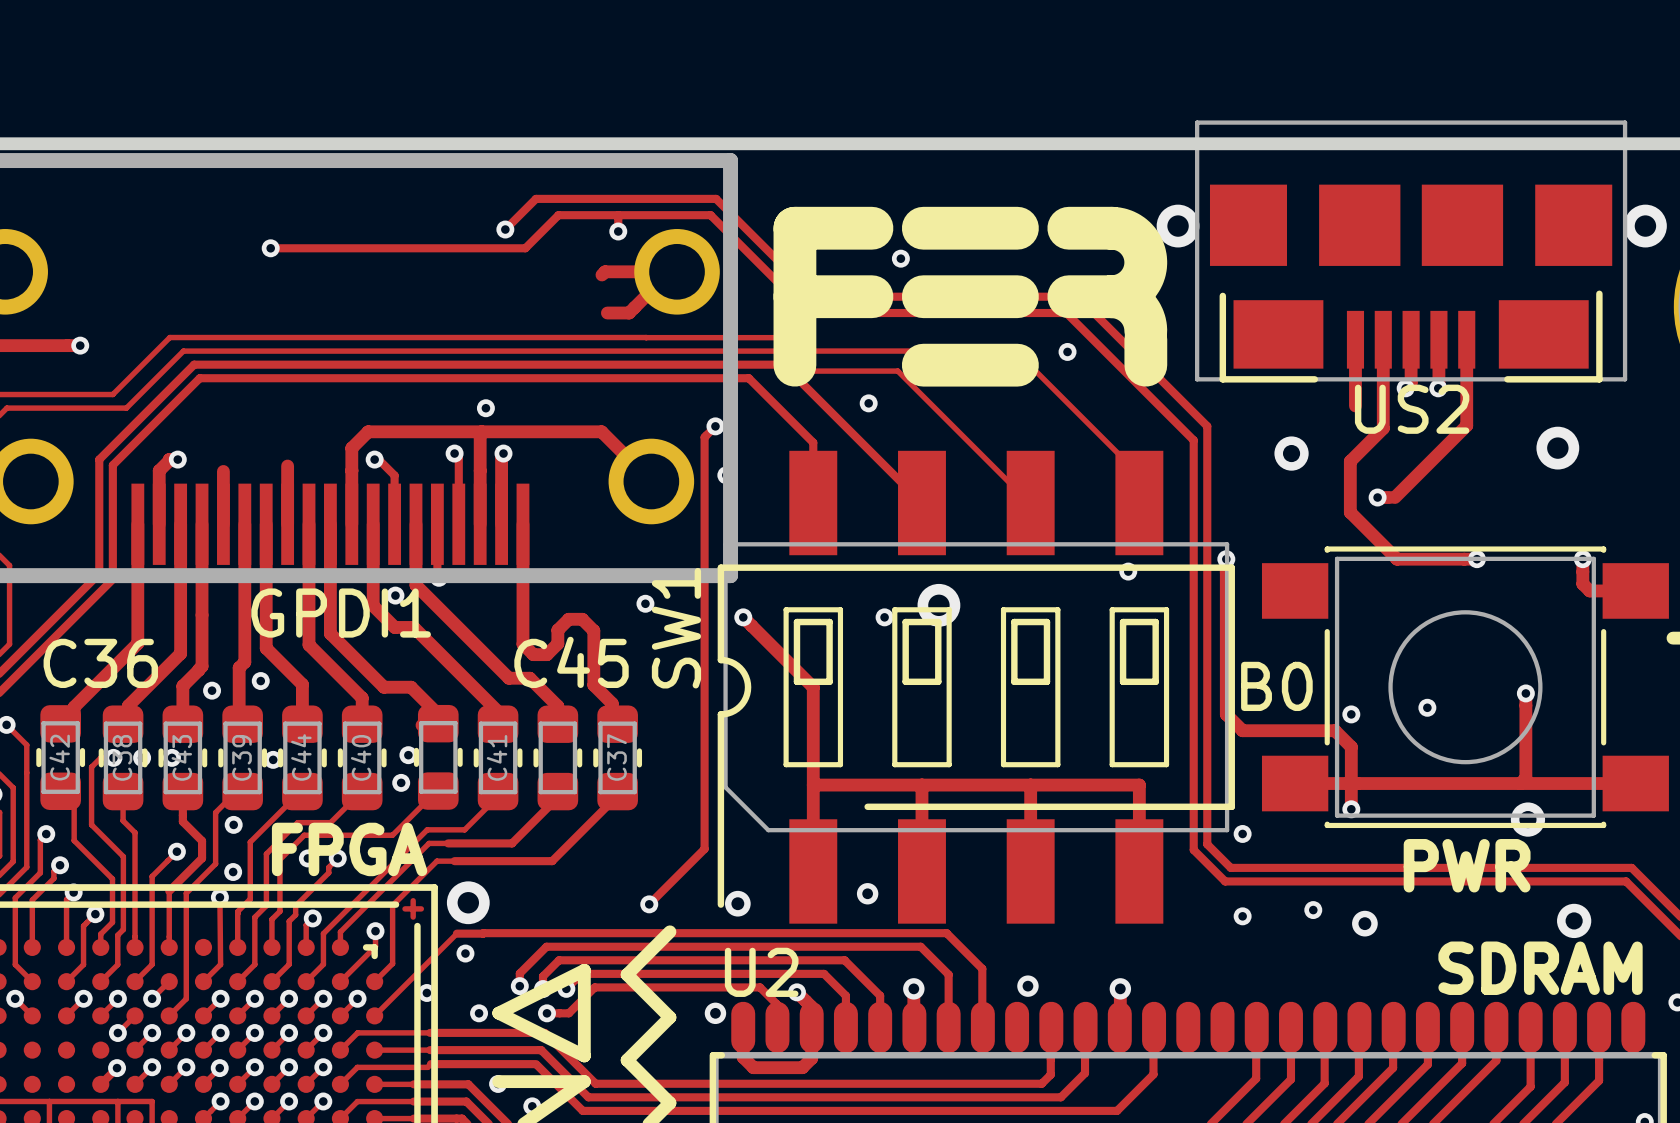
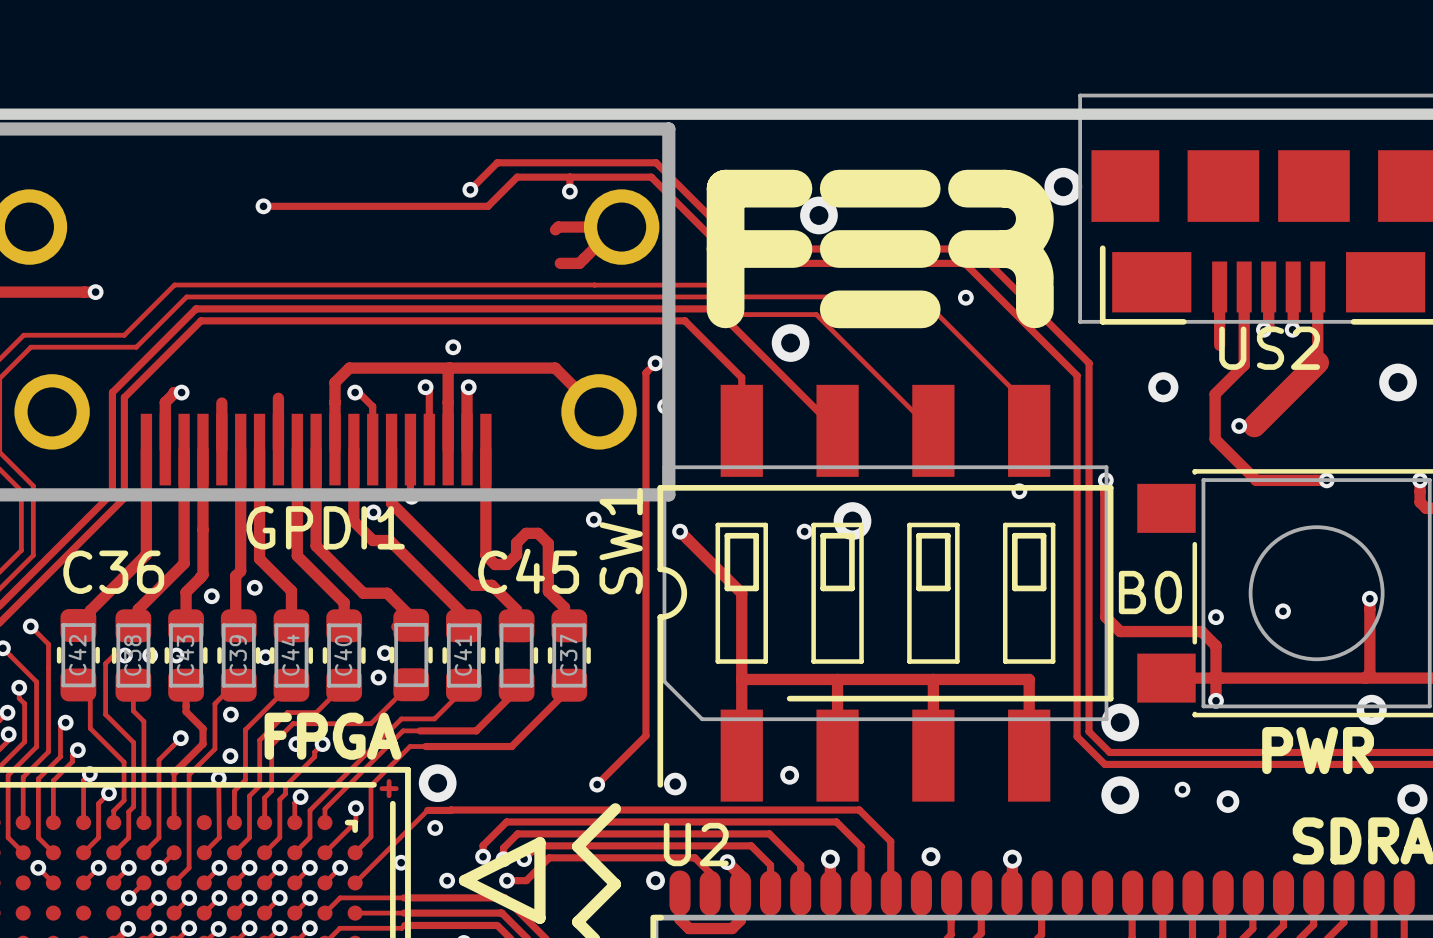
via size: [891, 249, 910, 268] -> [800, 196, 838, 235]
via size: [859, 394, 878, 413] -> [771, 324, 810, 362]
track width: thin (1466, 425) (1394, 497) -> thick (1317, 362) (1254, 426)
via size: [1233, 825, 1252, 843] -> [1101, 703, 1140, 742]
via size: [1233, 907, 1252, 926] -> [1101, 776, 1140, 815]

